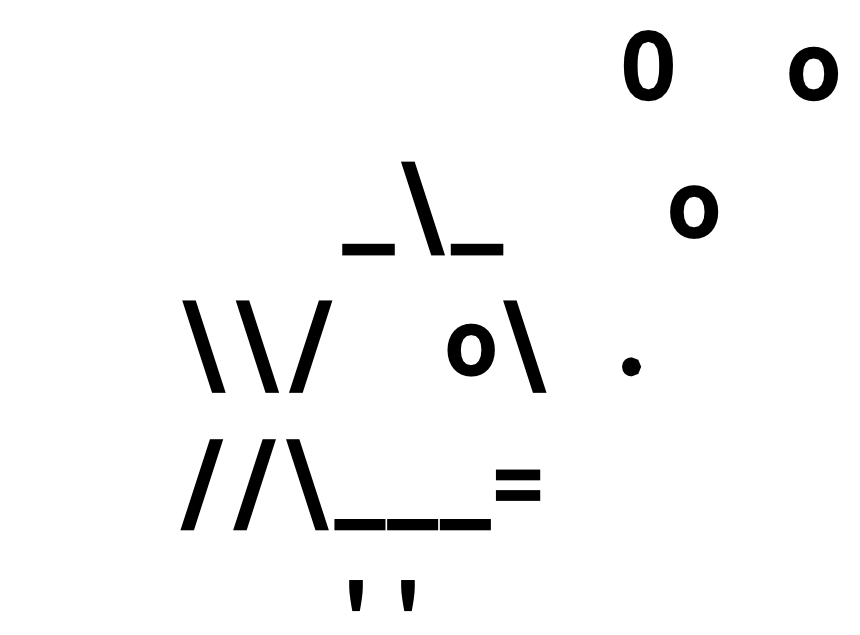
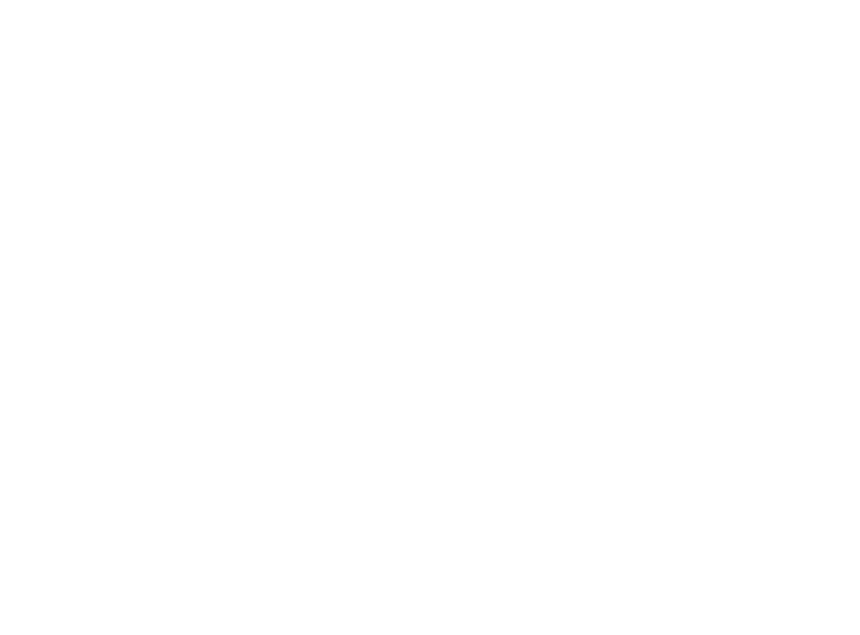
drawing: [180, 30, 839, 612] -> none

